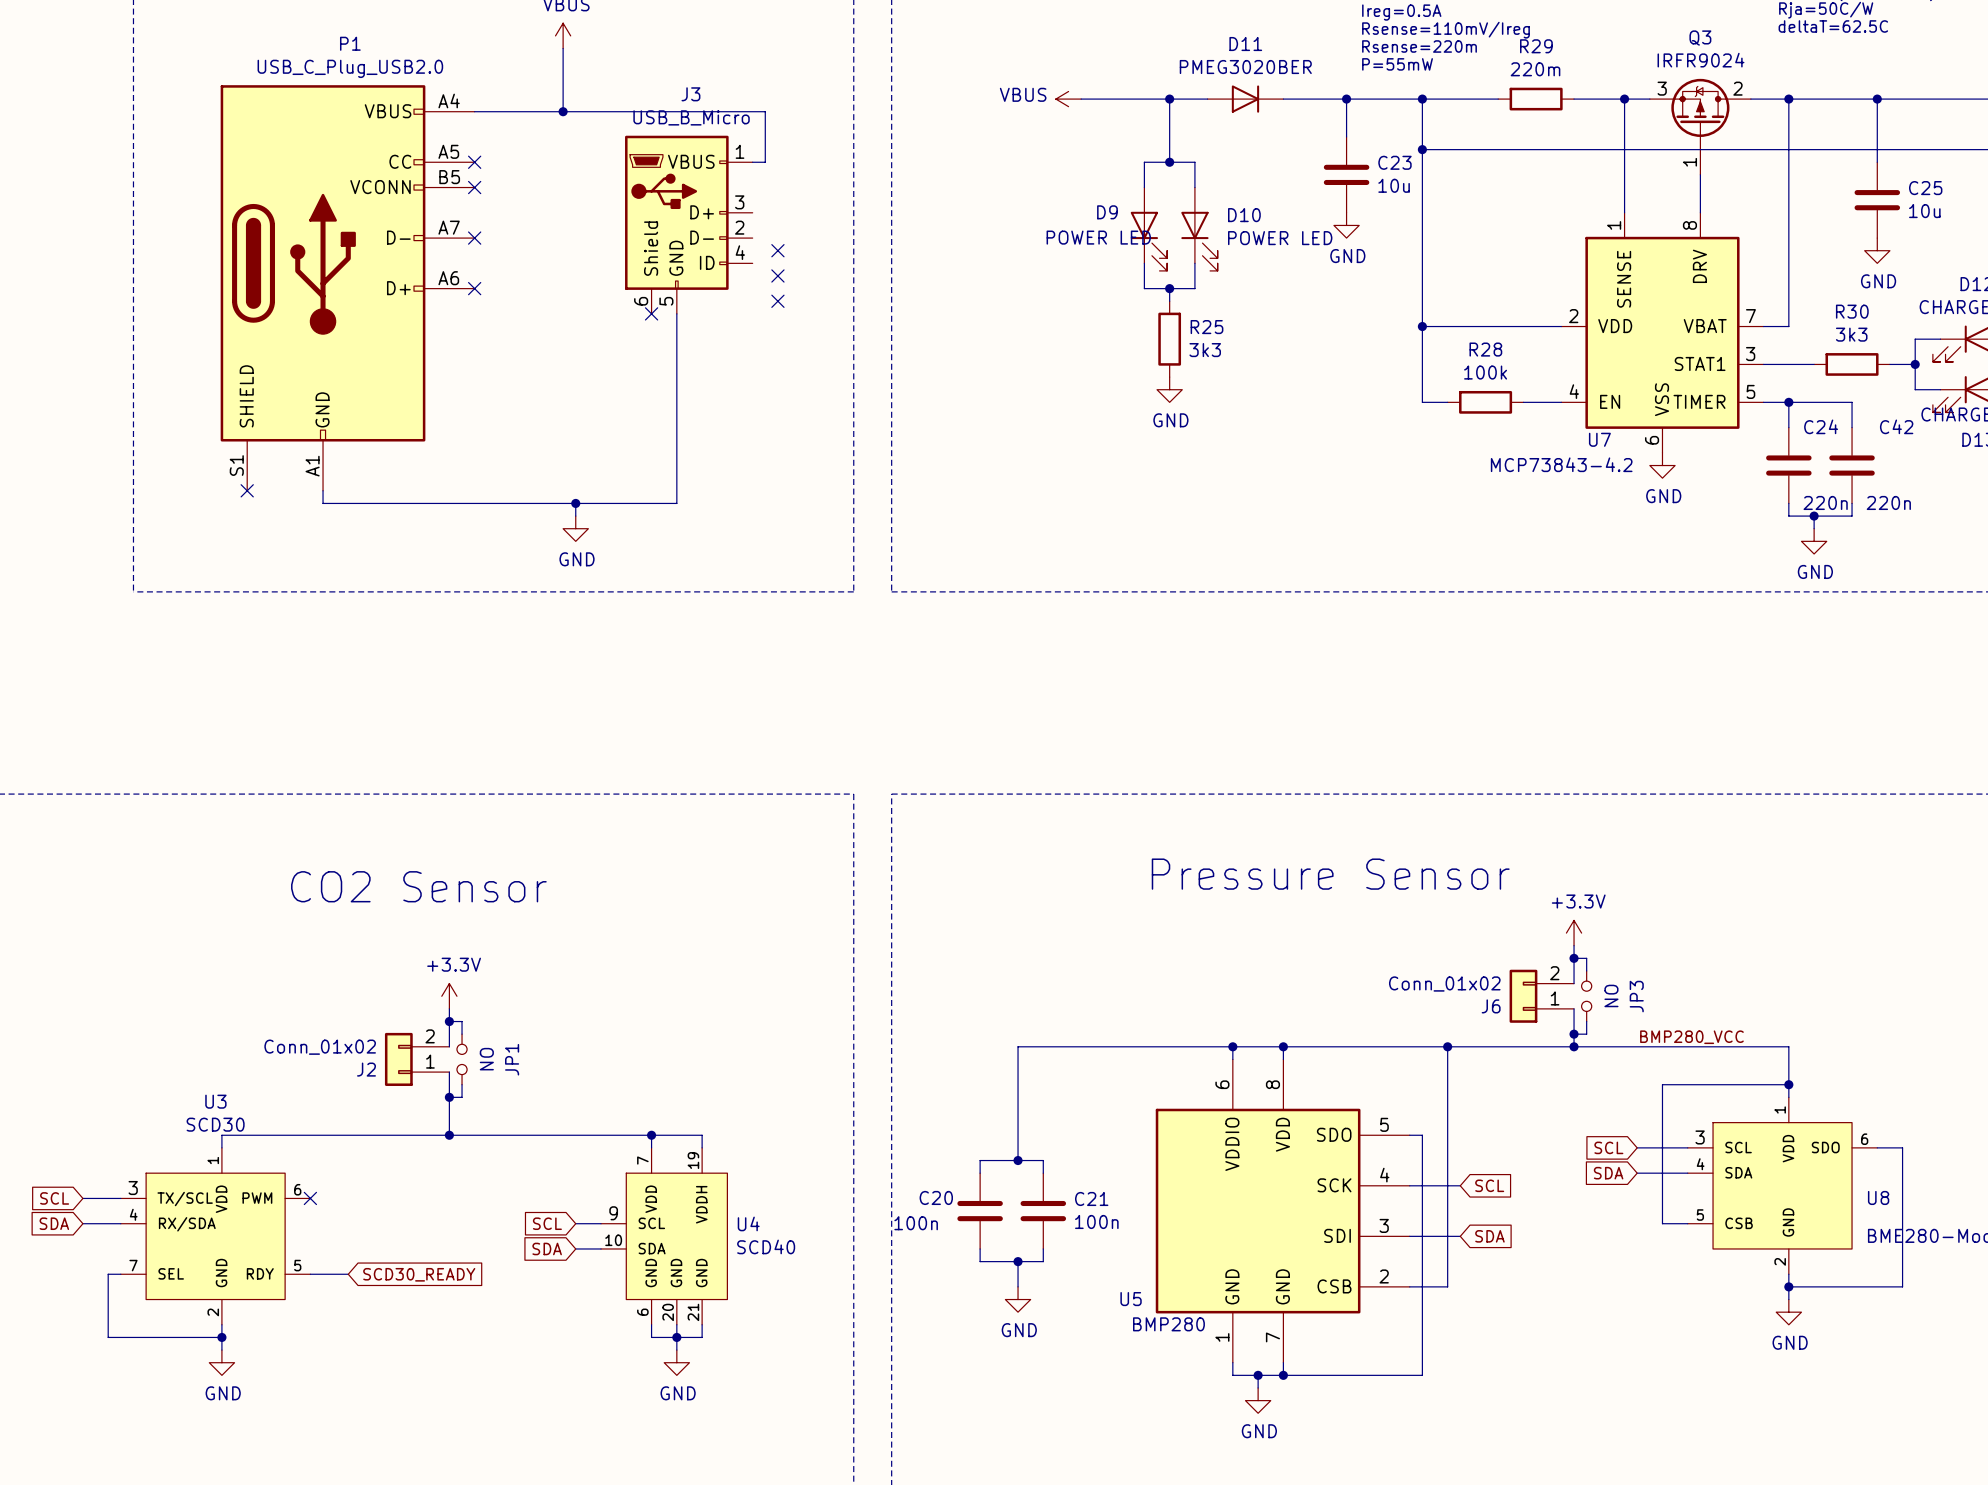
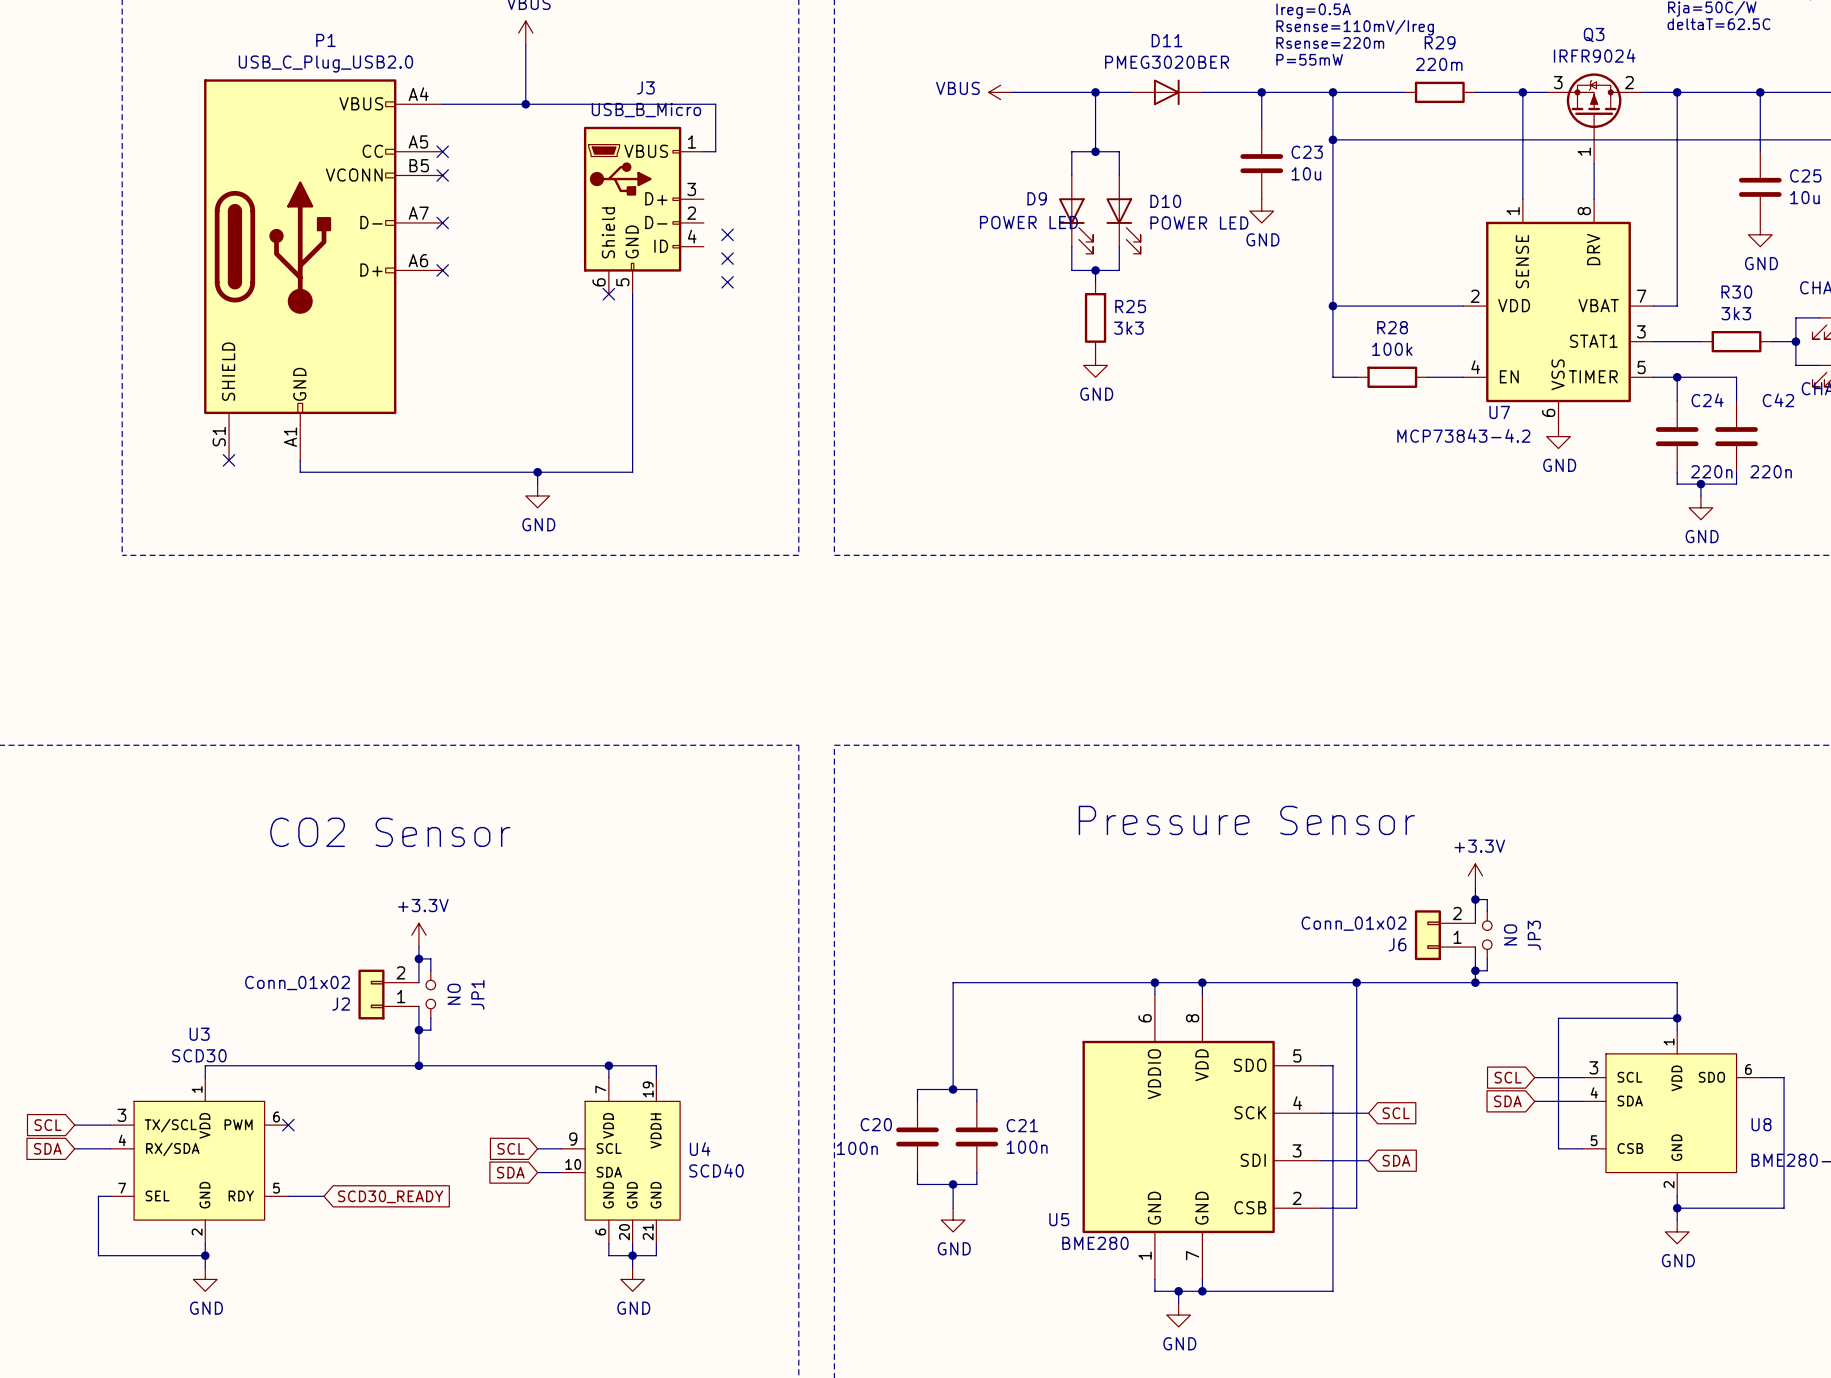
label: BMP280_VCC (1691, 1037) -> none
U5 value: BMP280 (1168, 1324) -> BME280 (1095, 1243)

